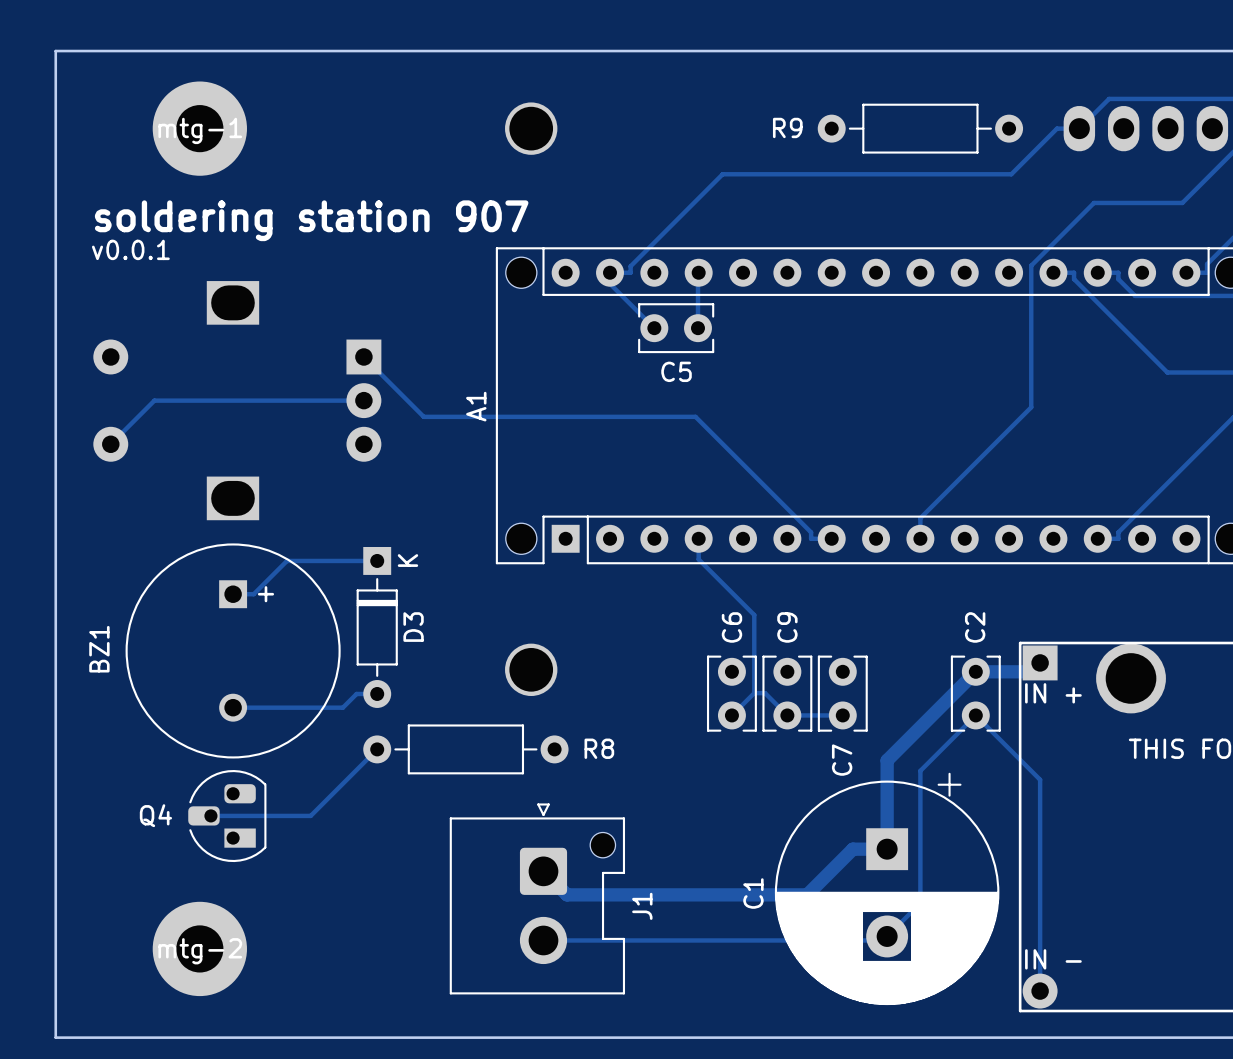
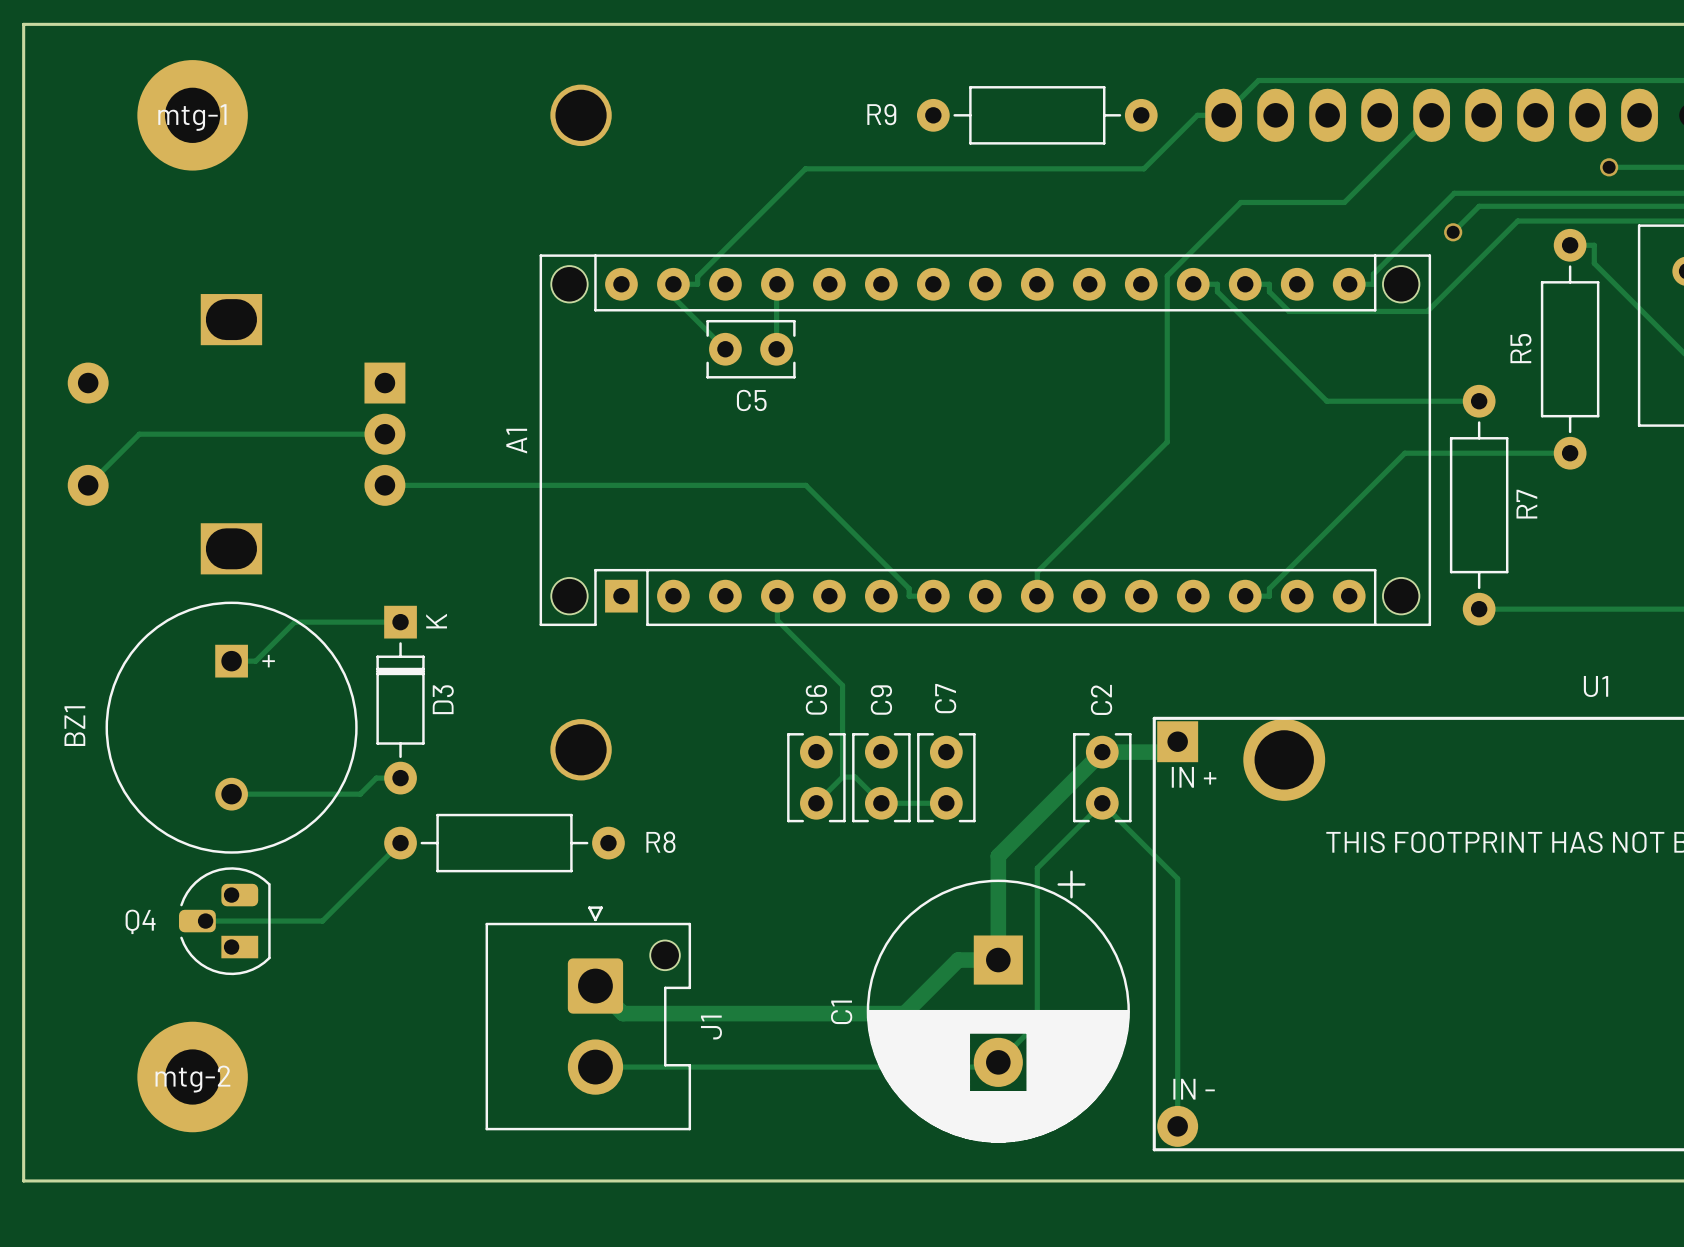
text: soldering station 907 (311, 220) -> none
text: v0.0.1 (130, 249) -> none
track: (363, 356) (423, 416) (695, 416) (722, 444) -> (384, 485) (805, 485)
C7 name position: C7 (842, 760) -> C7 (945, 698)

